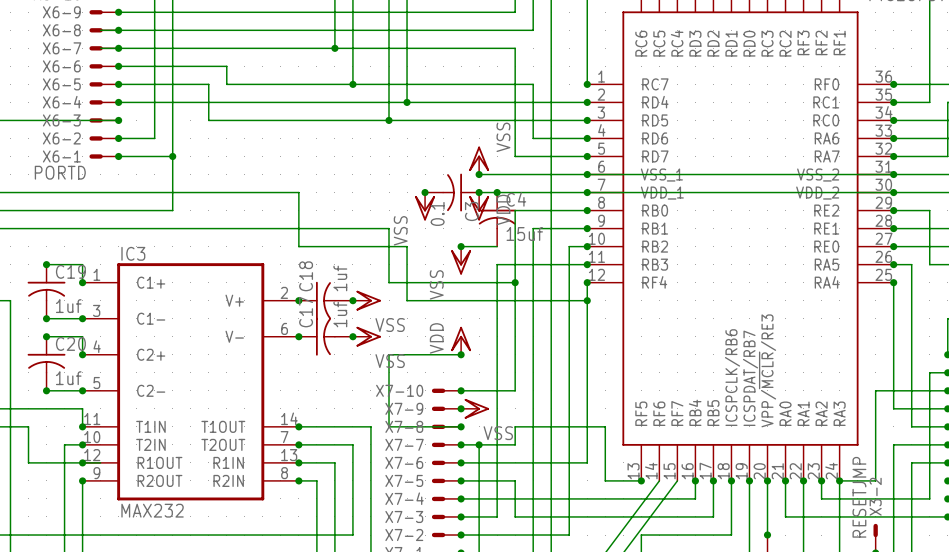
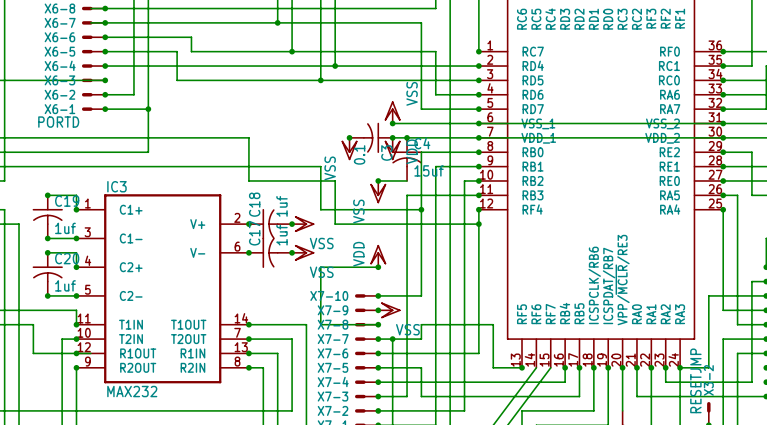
junction: (767, 535) -> none

